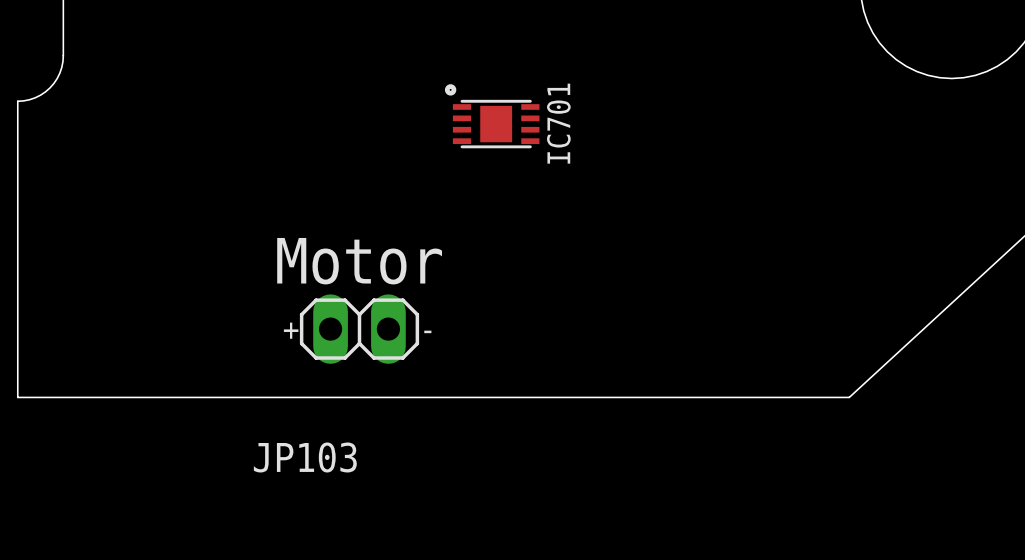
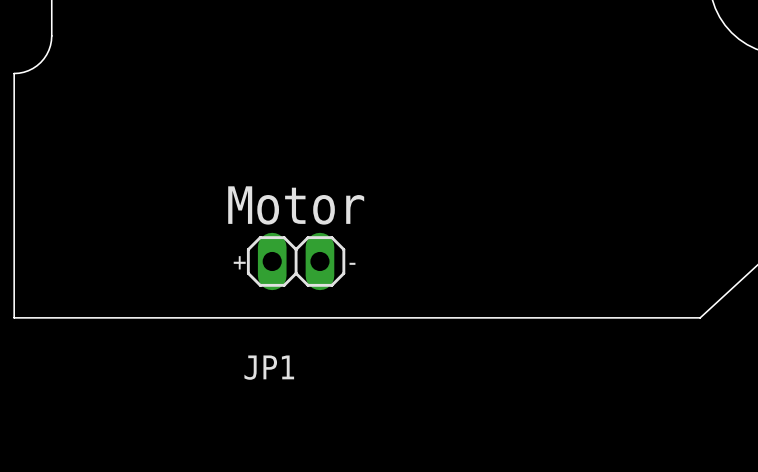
IC701: (492, 116) -> none
JP103 name: JP103 (305, 457) -> JP1 (269, 367)

